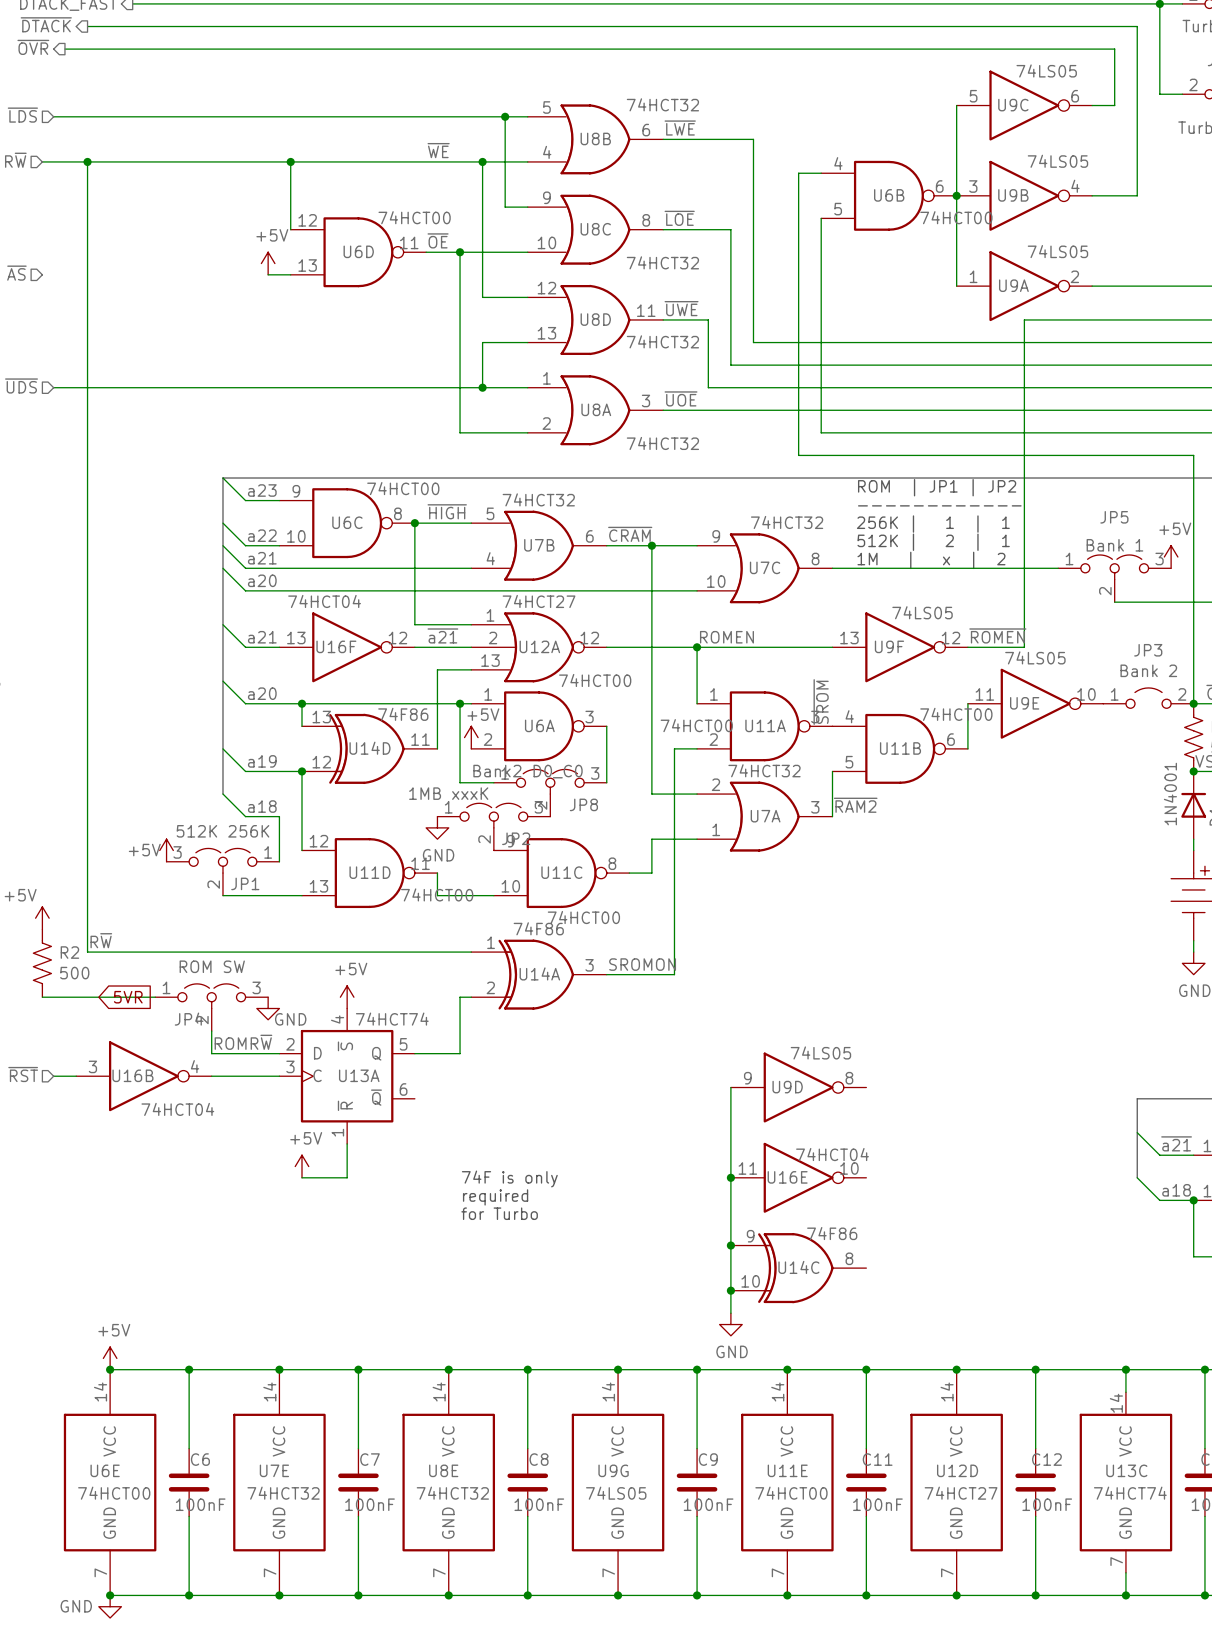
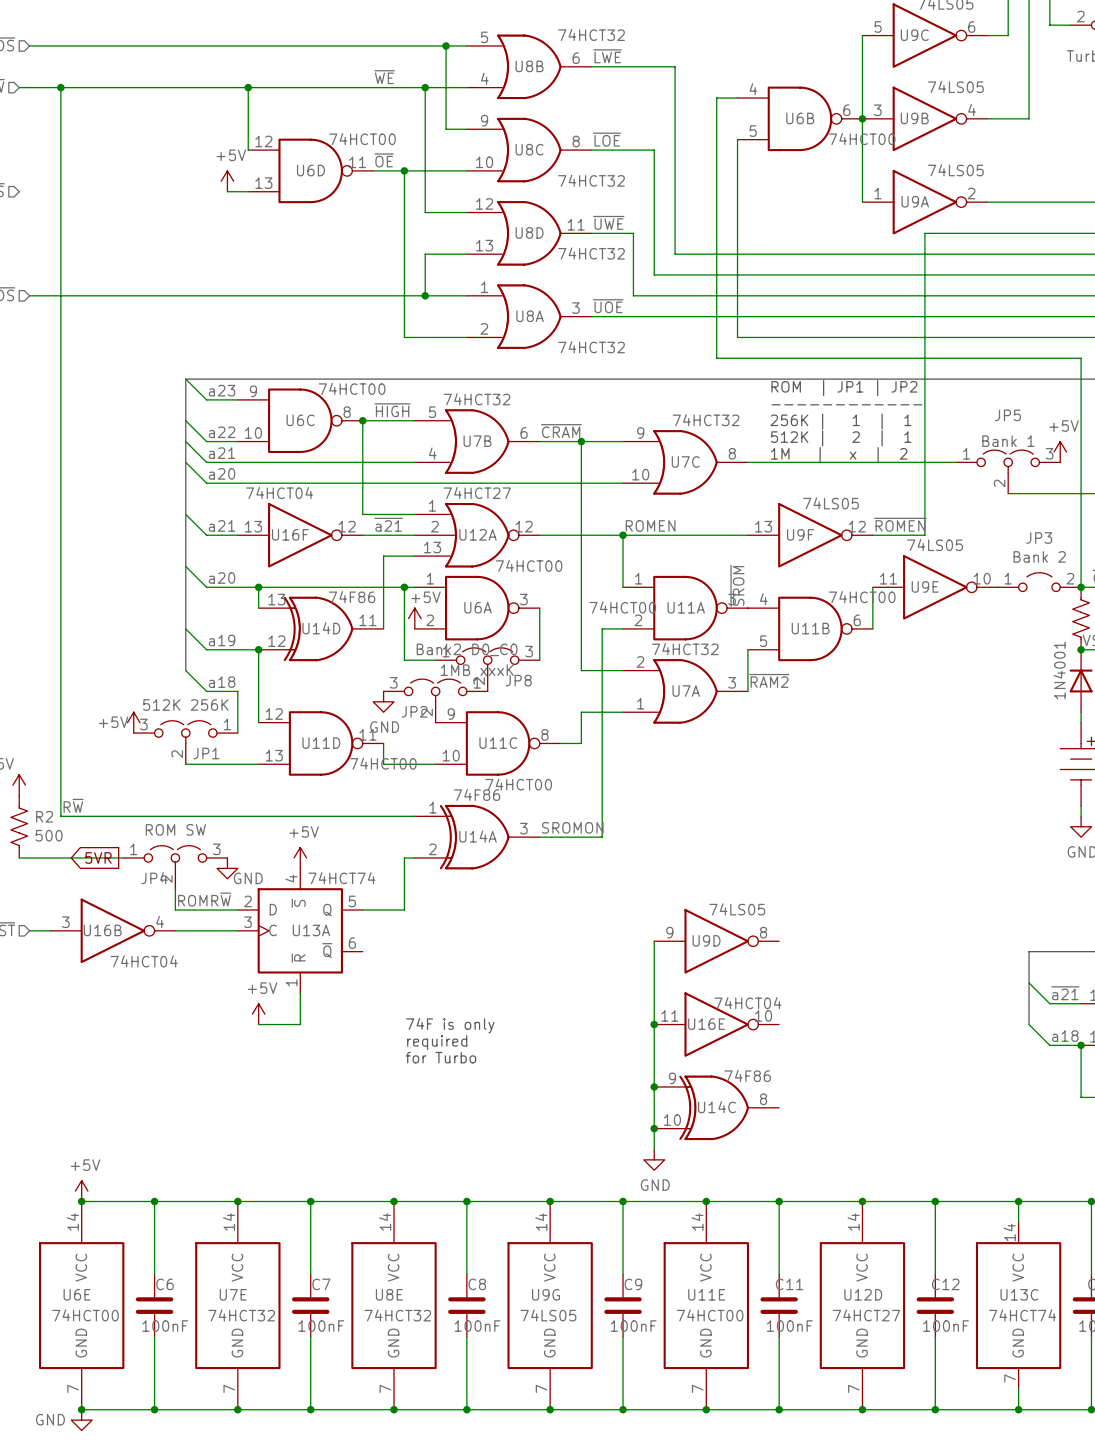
JP2 flip: as is (493, 815) -> left-right (435, 690)

